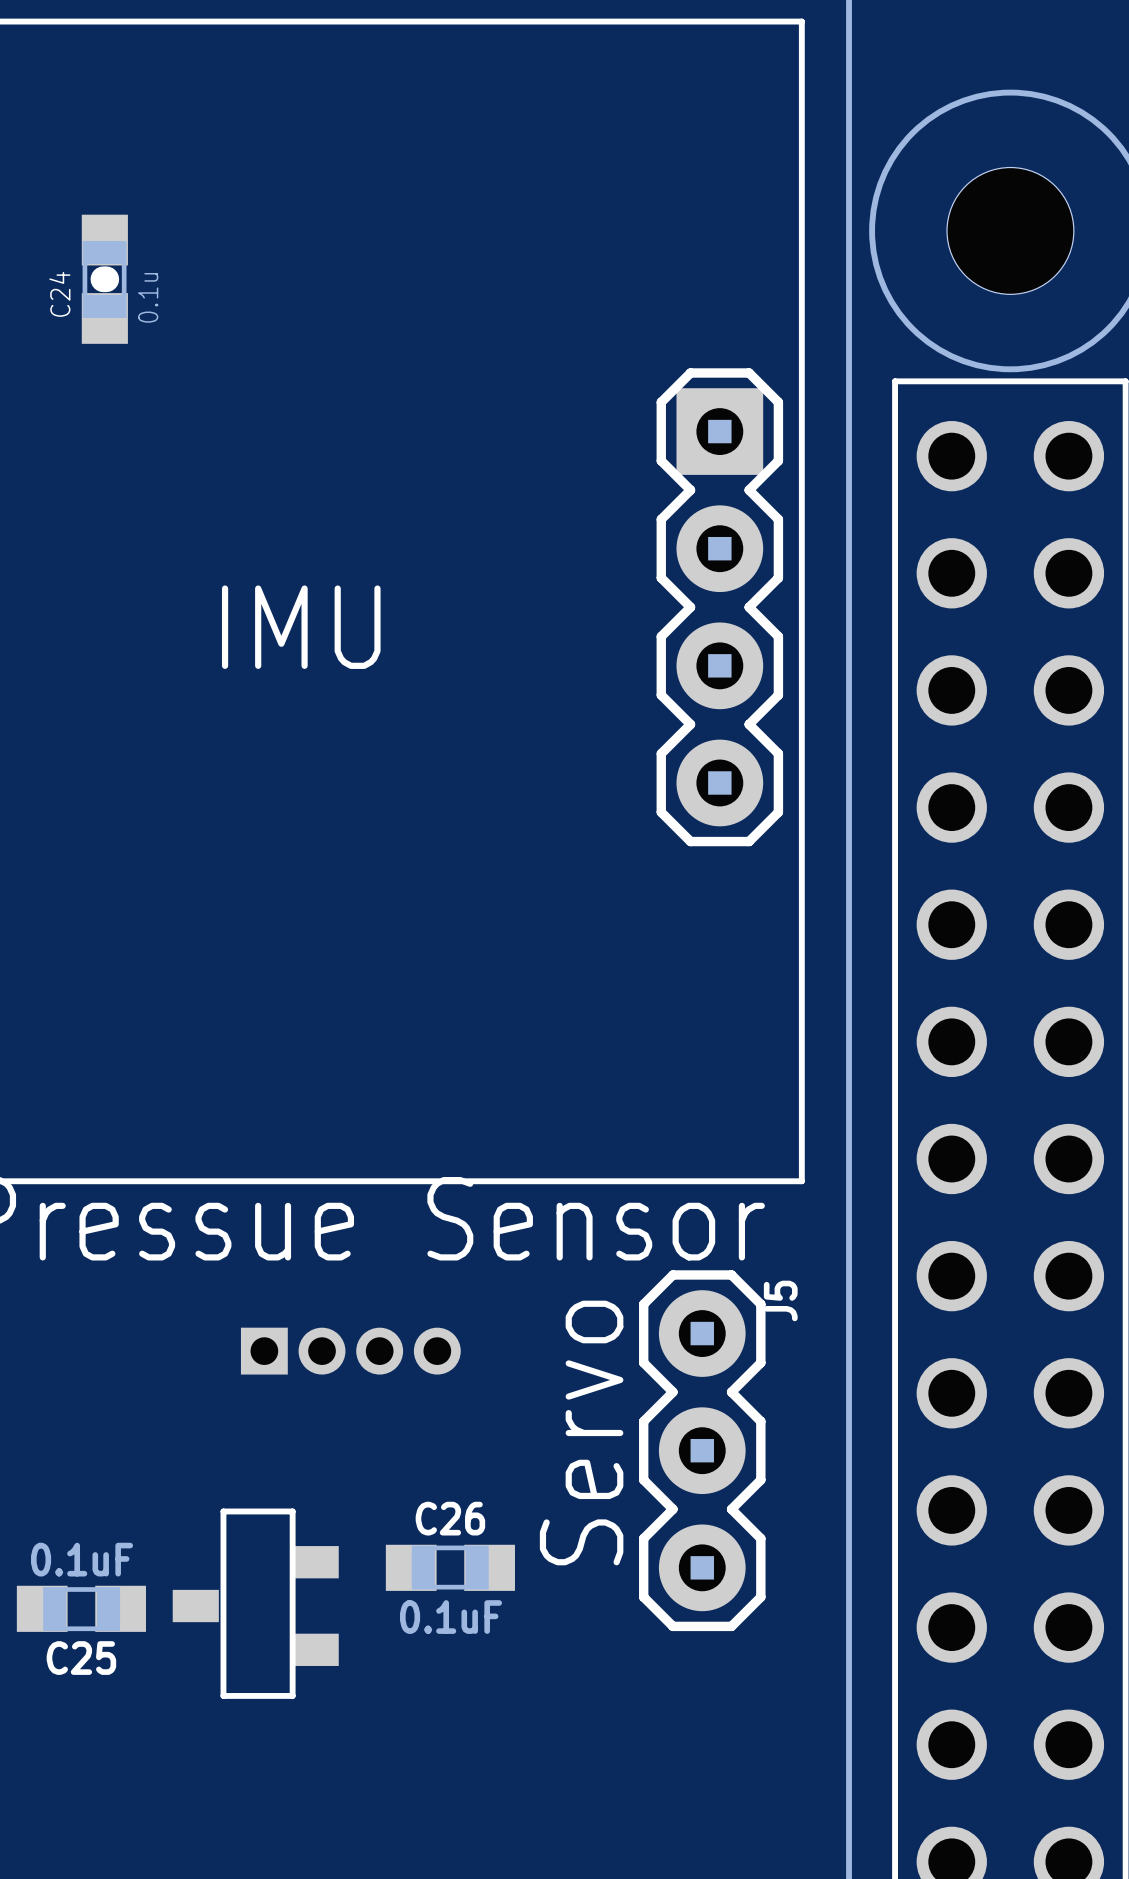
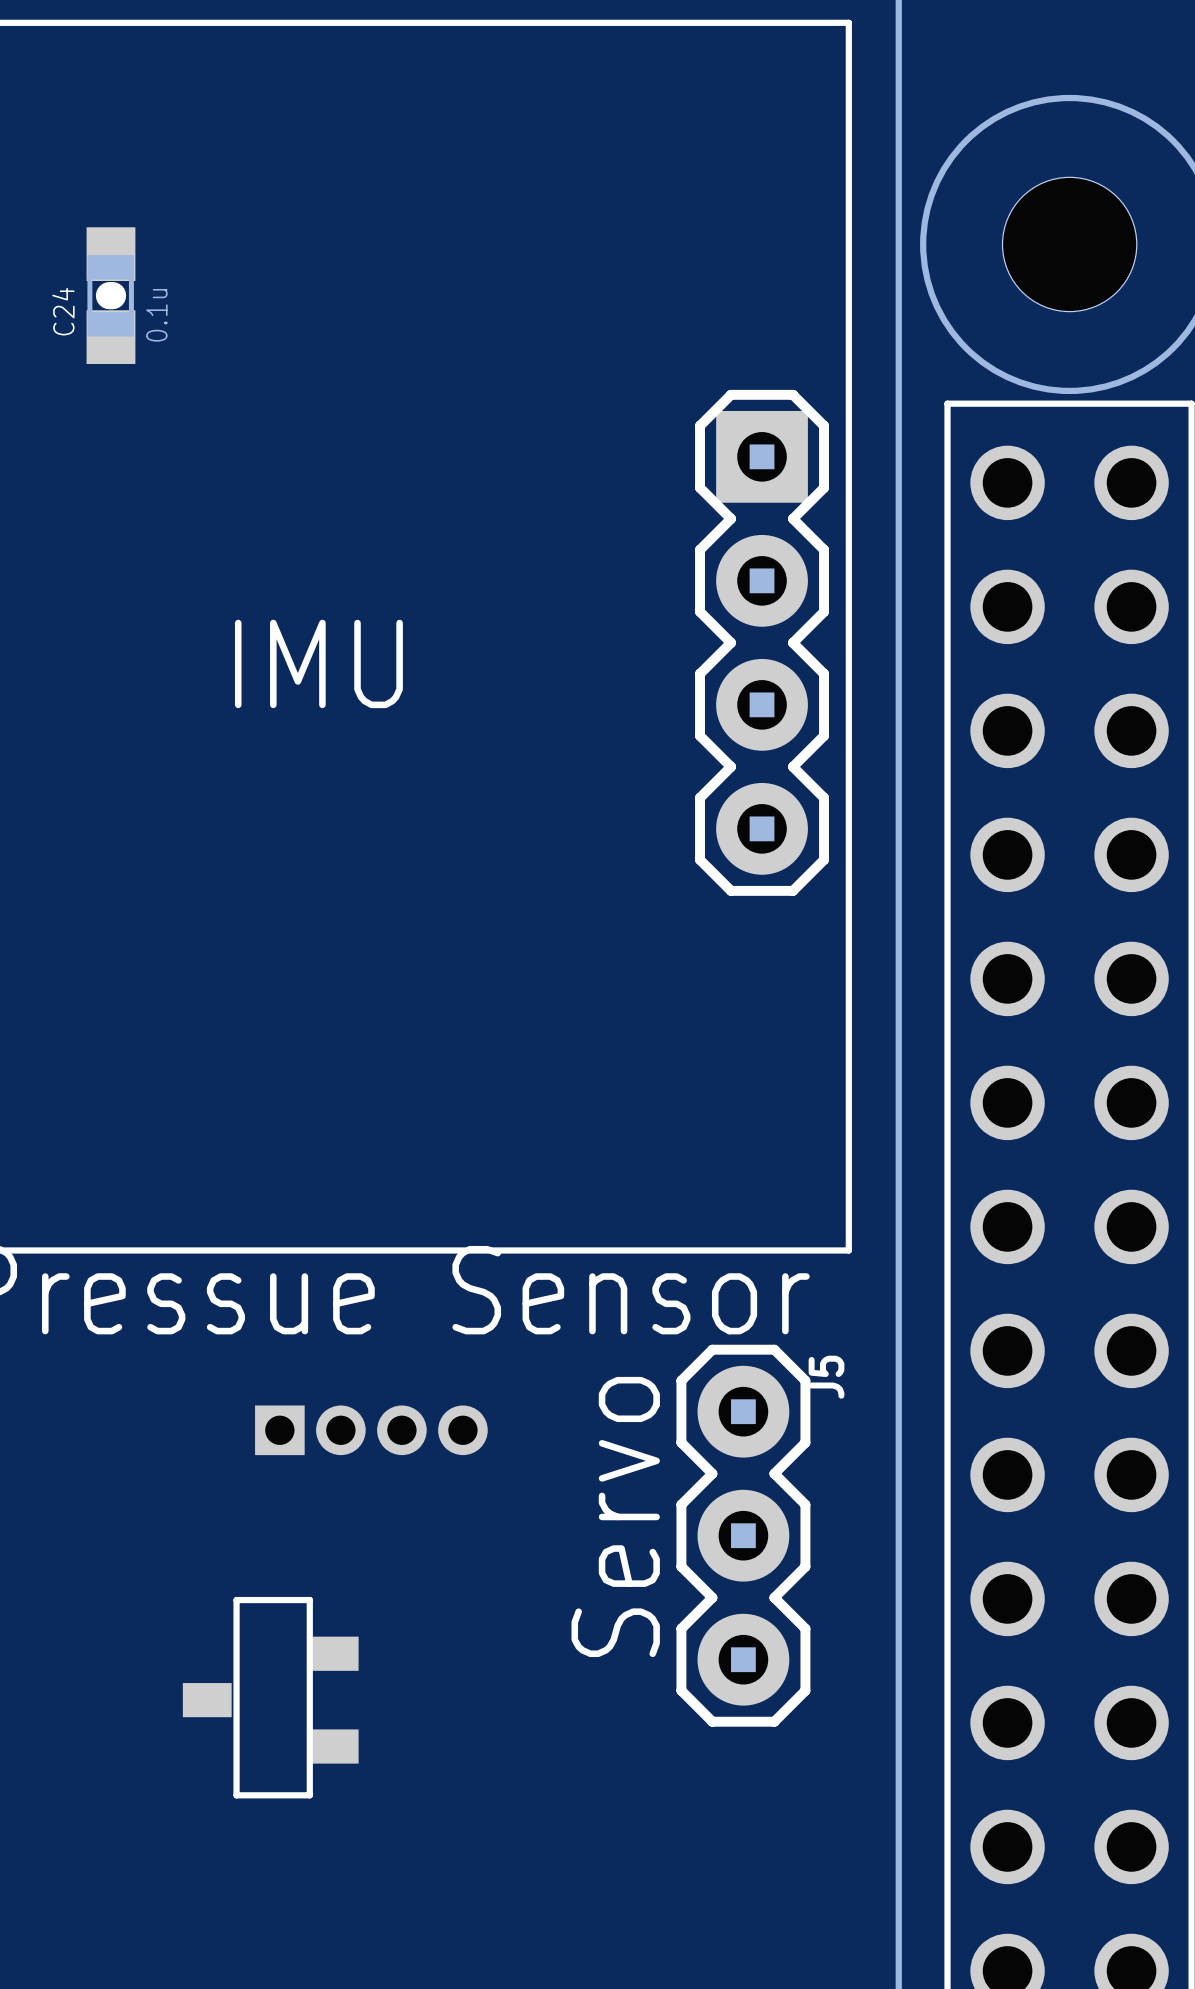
C26: 0.1uF (450, 1567) -> none
C25: 0.1uF (81, 1608) -> none

